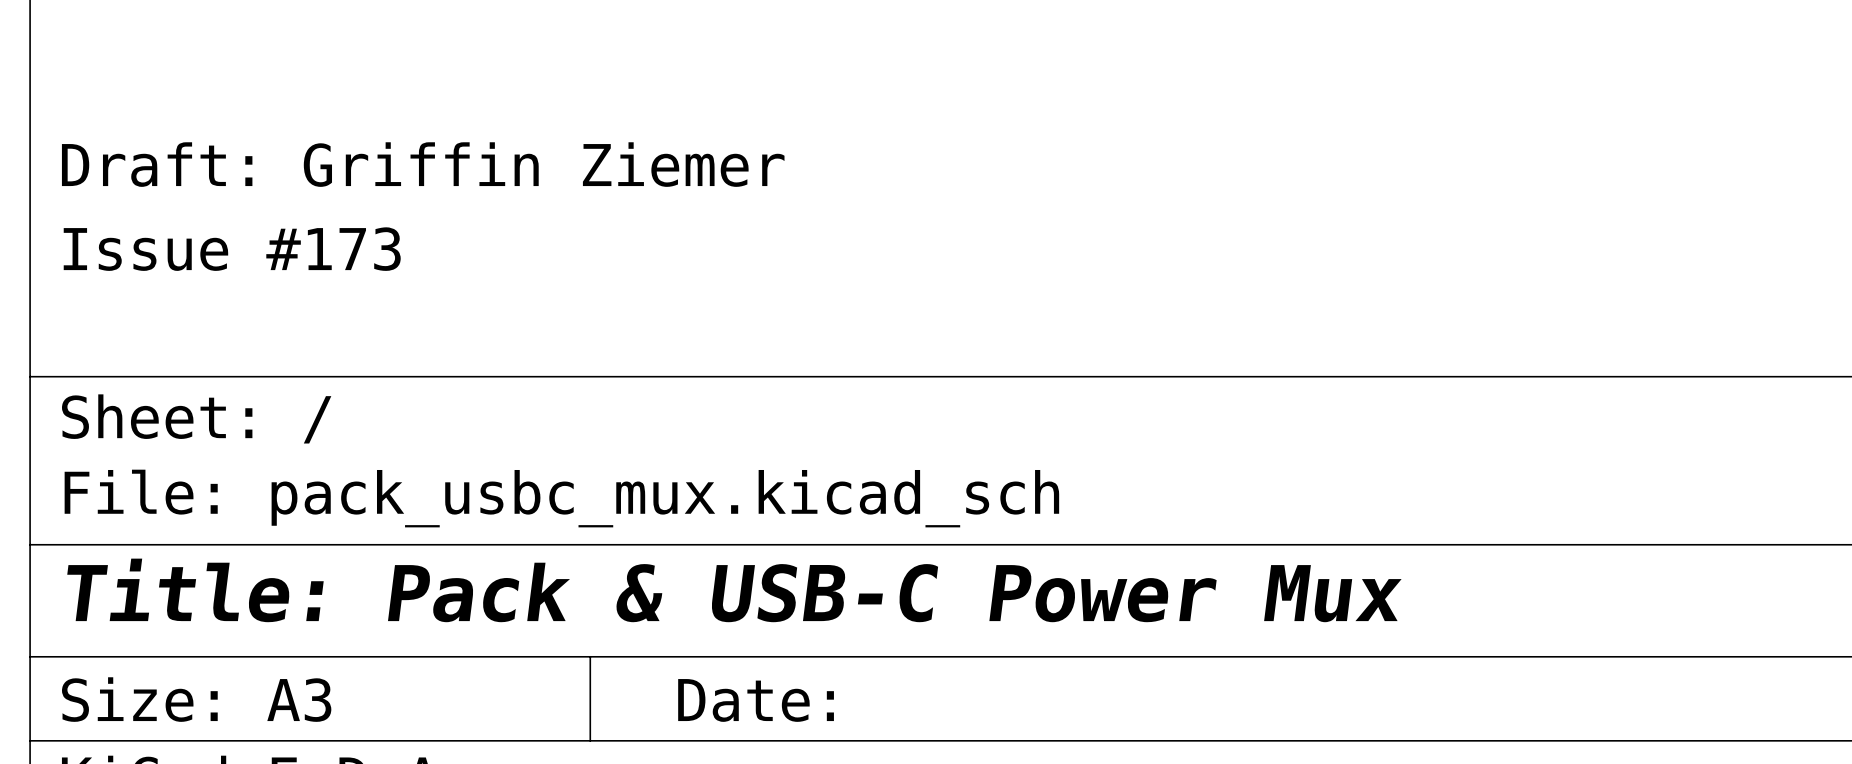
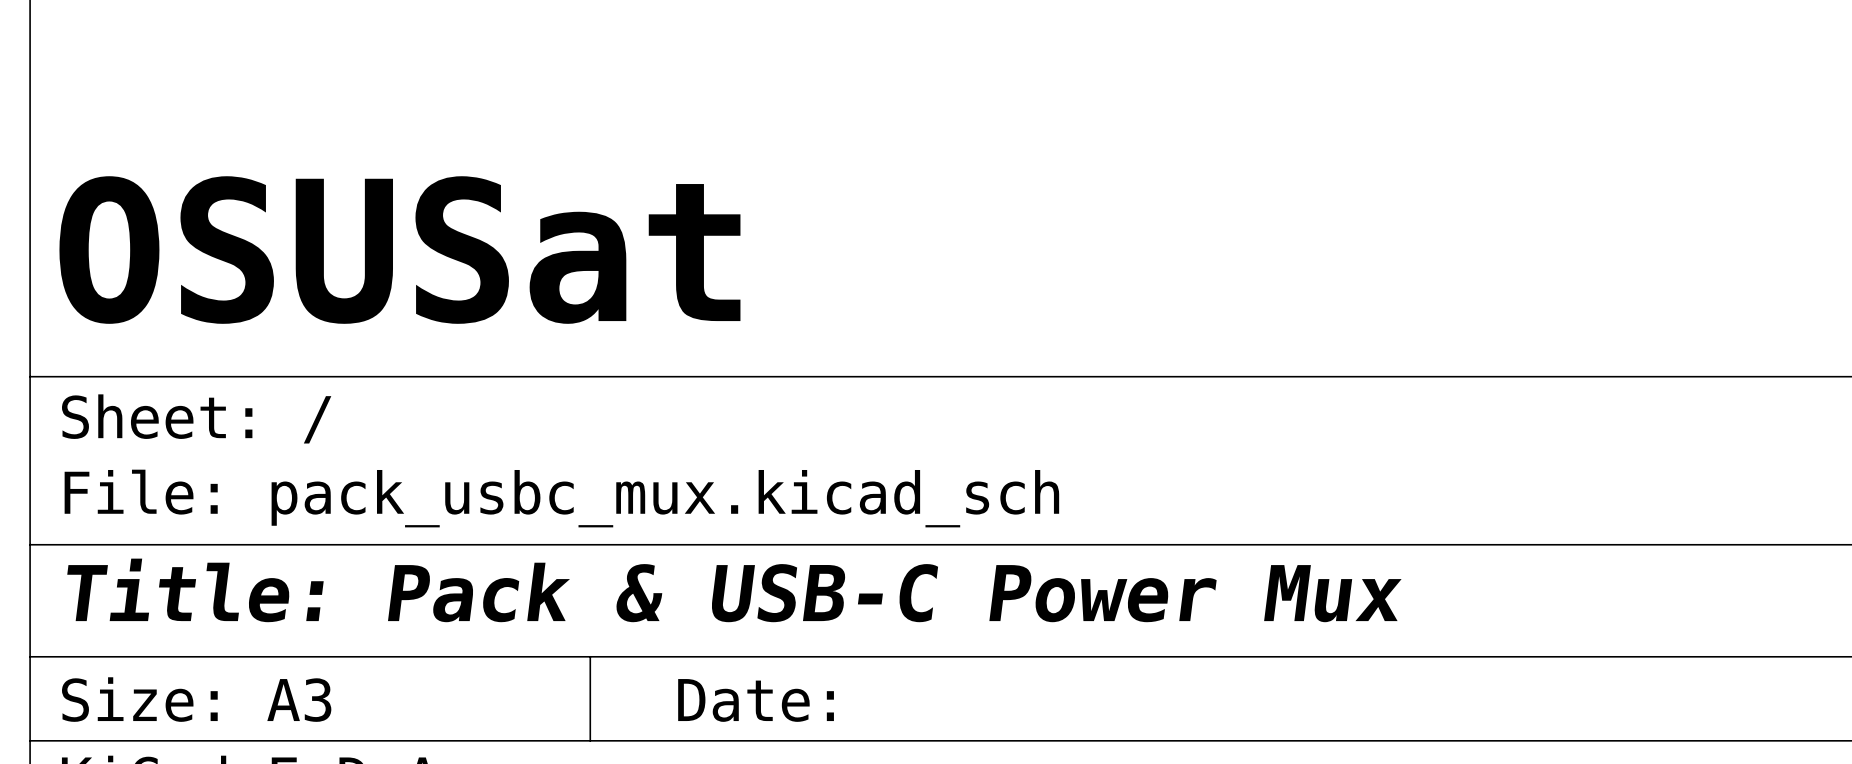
title block: Draft: Griffin Ziemer (423, 164) -> none
title block: Issue #173 (232, 249) -> none
text: none -> OSUSat (399, 250)

